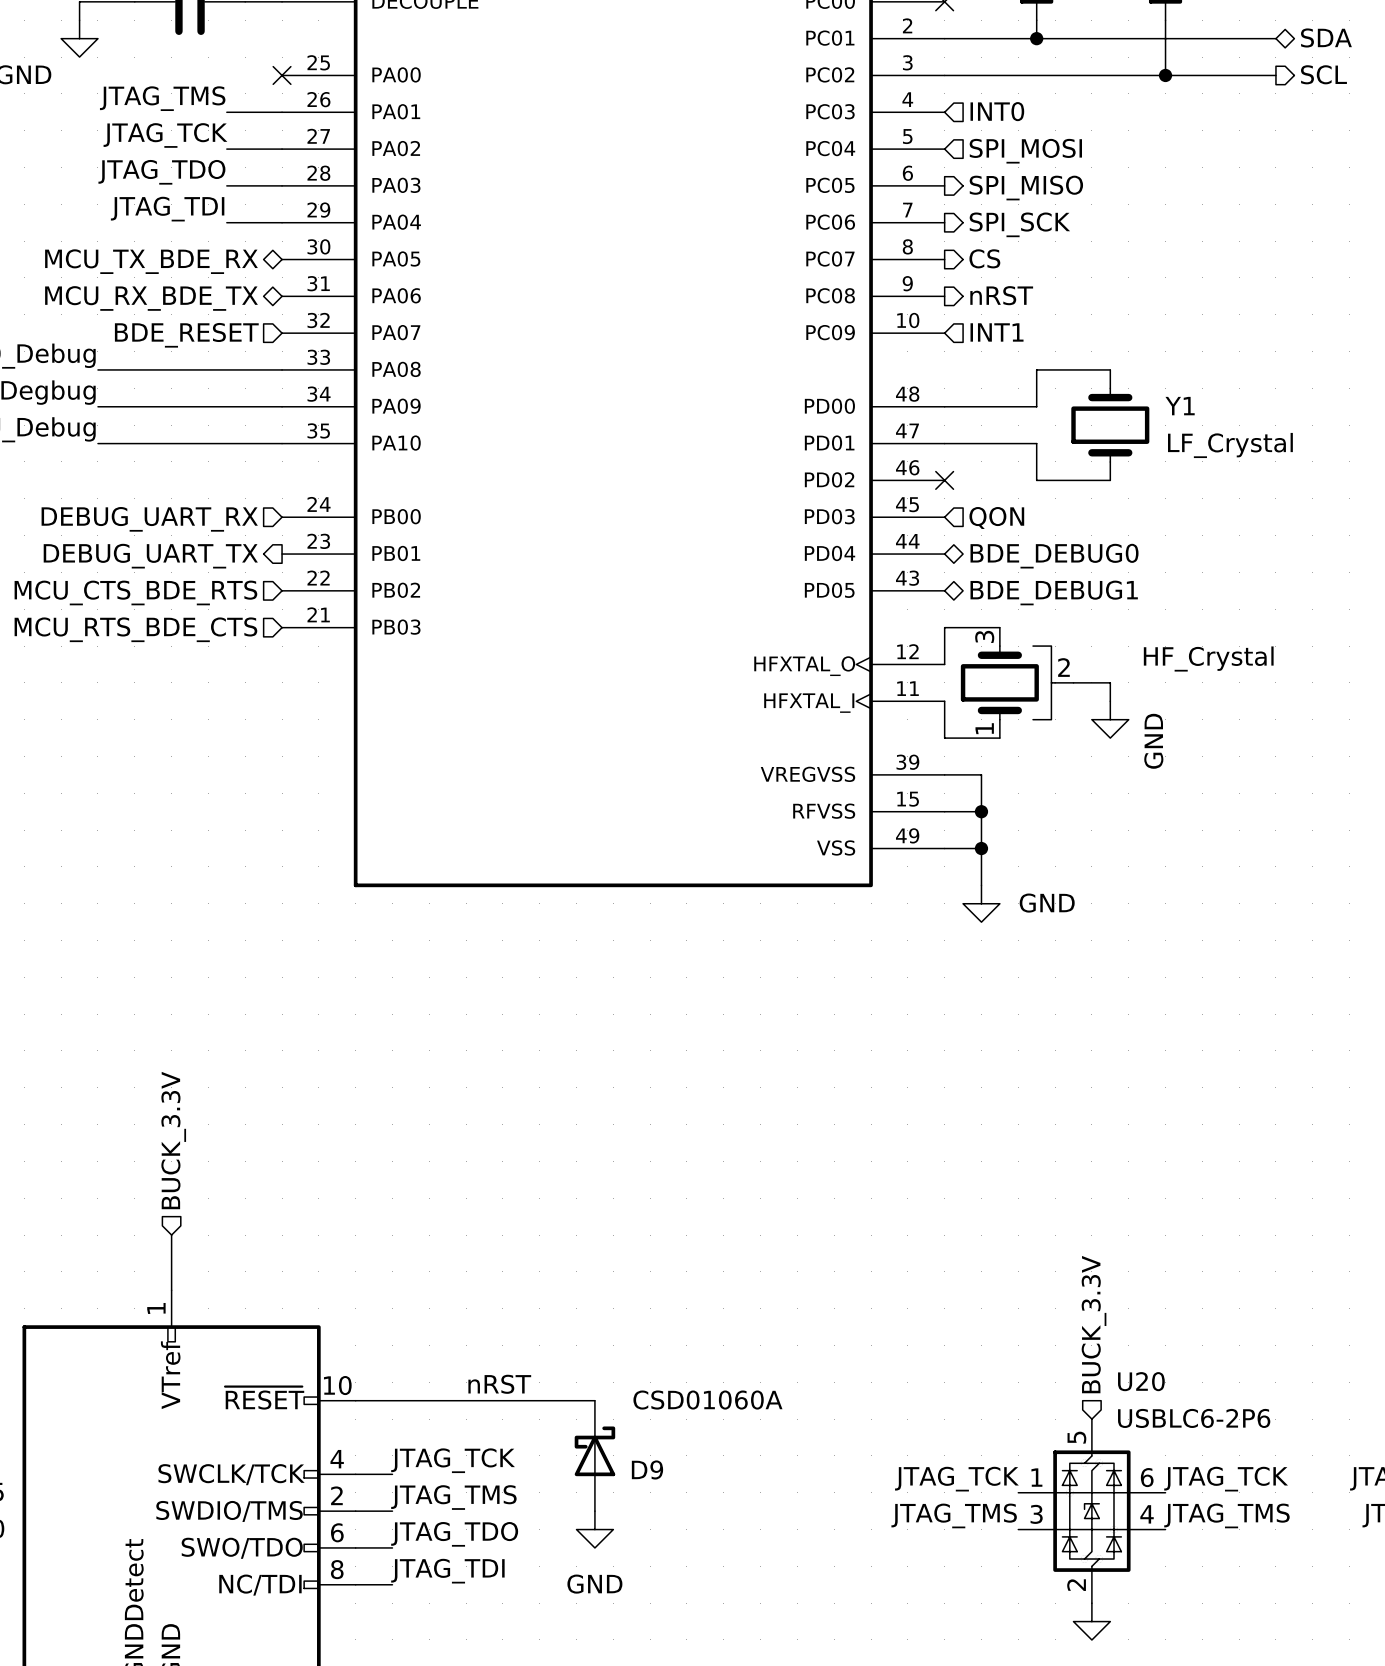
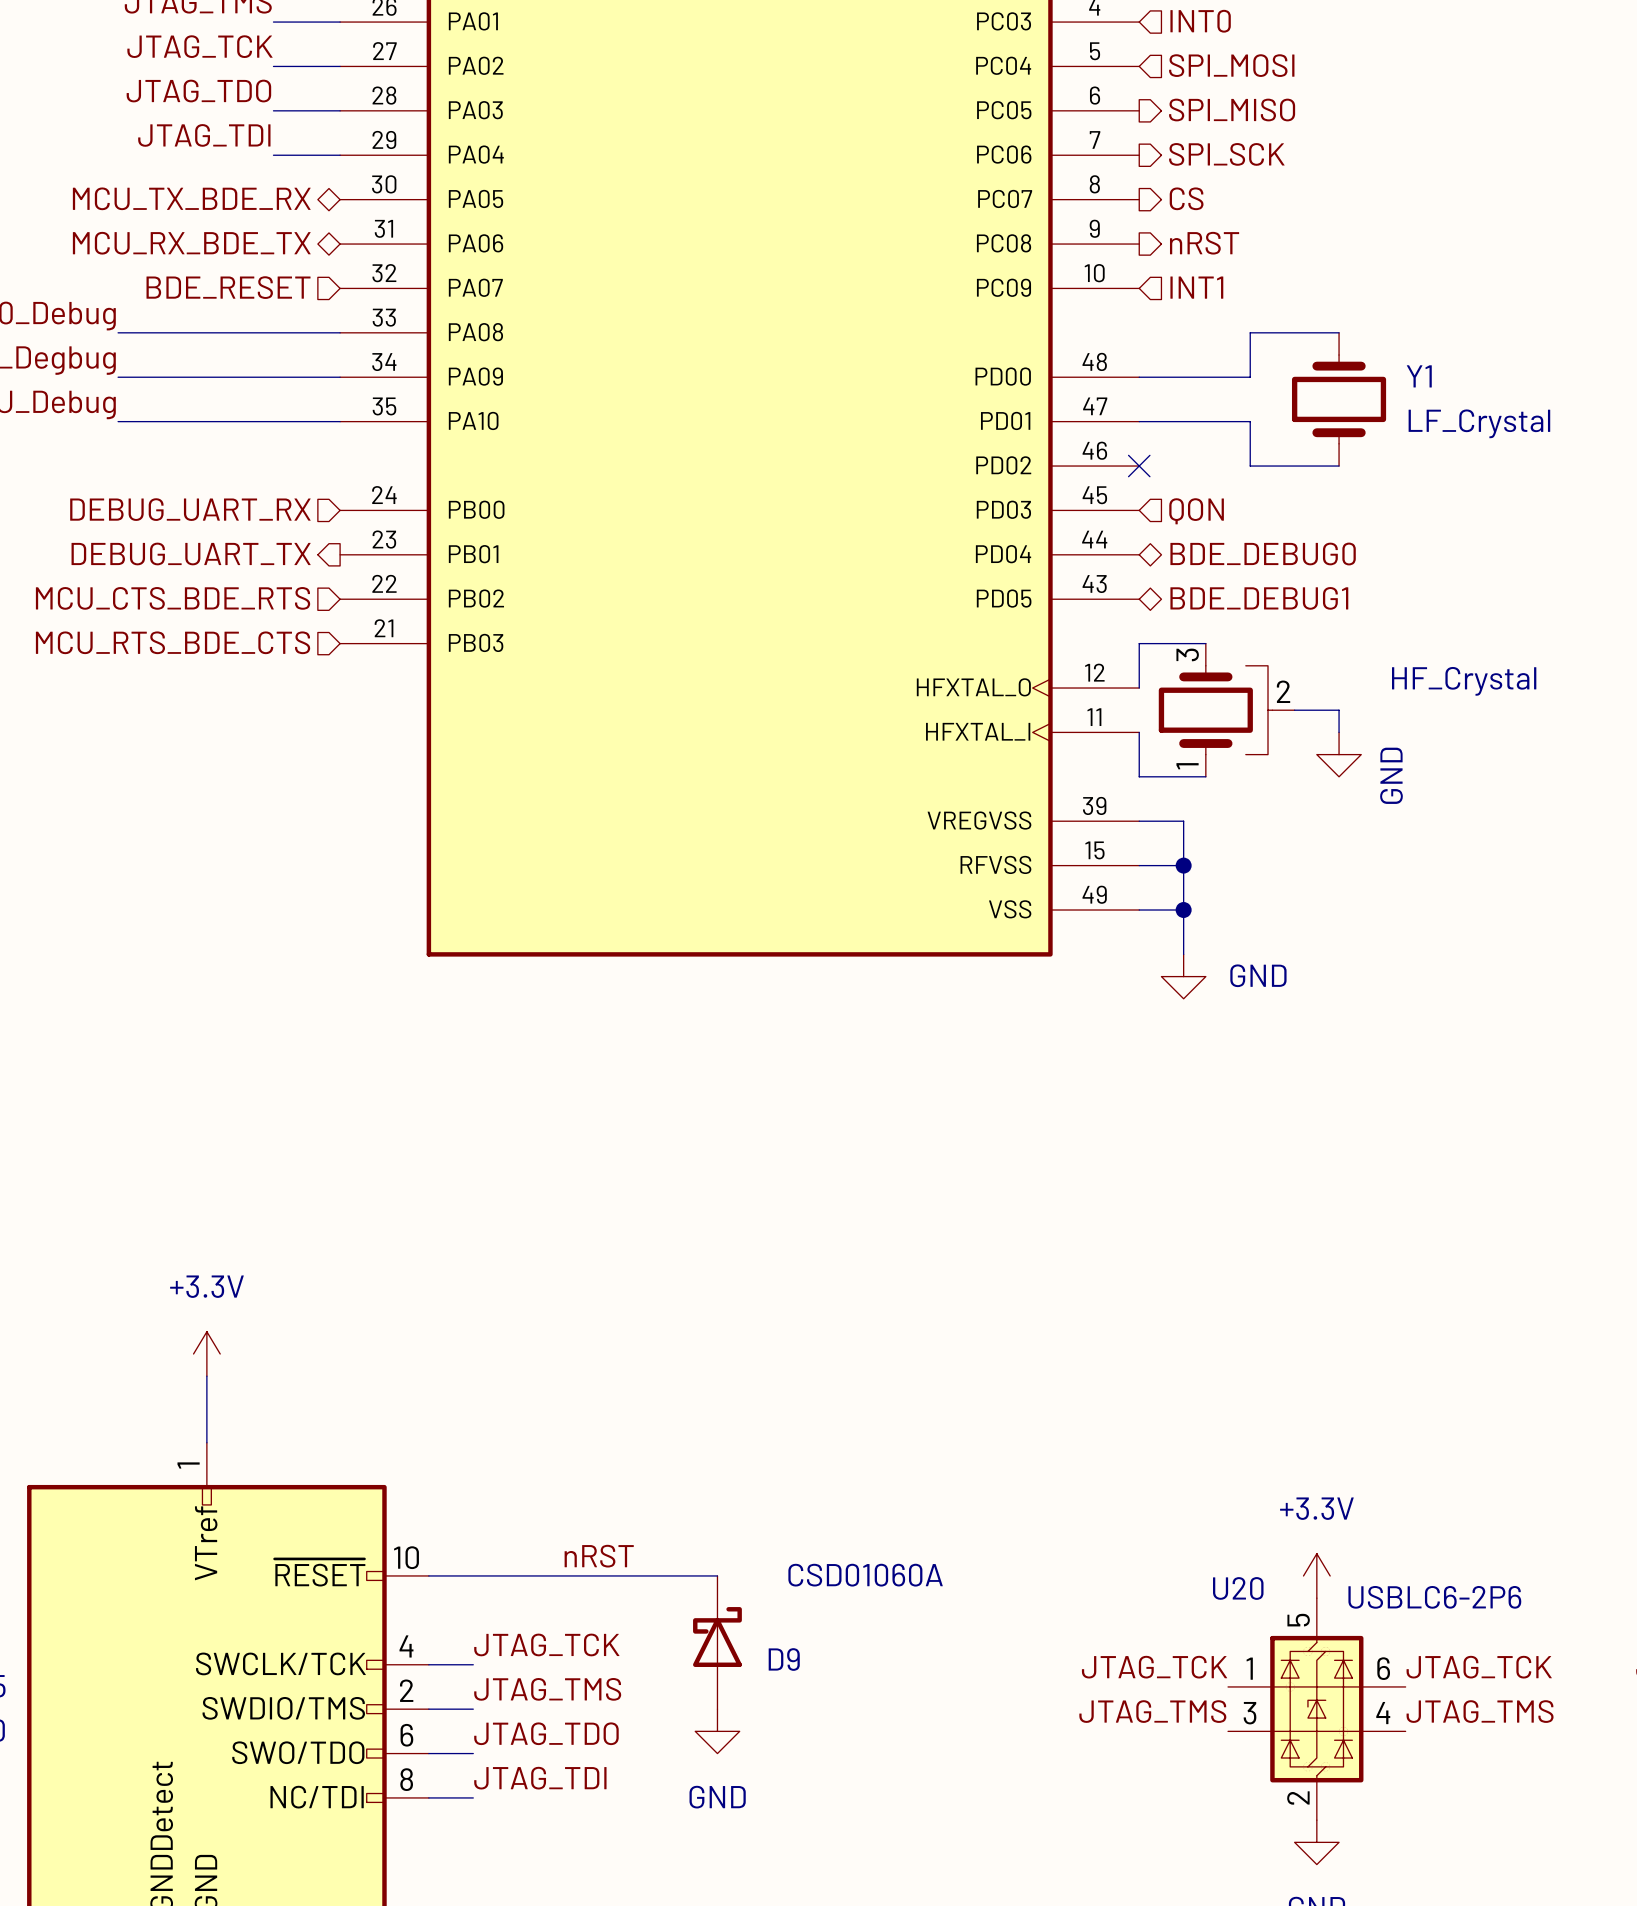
hierarchical label: BUCK_3.3V (173, 1140) -> none
power symbol: none -> +3.3V (206, 1353)
hierarchical label: BUCK_3.3V (1094, 1324) -> none
U20 name position: U20 (1141, 1381) -> U20 (1238, 1588)
power symbol: none -> +3.3V (1316, 1575)

